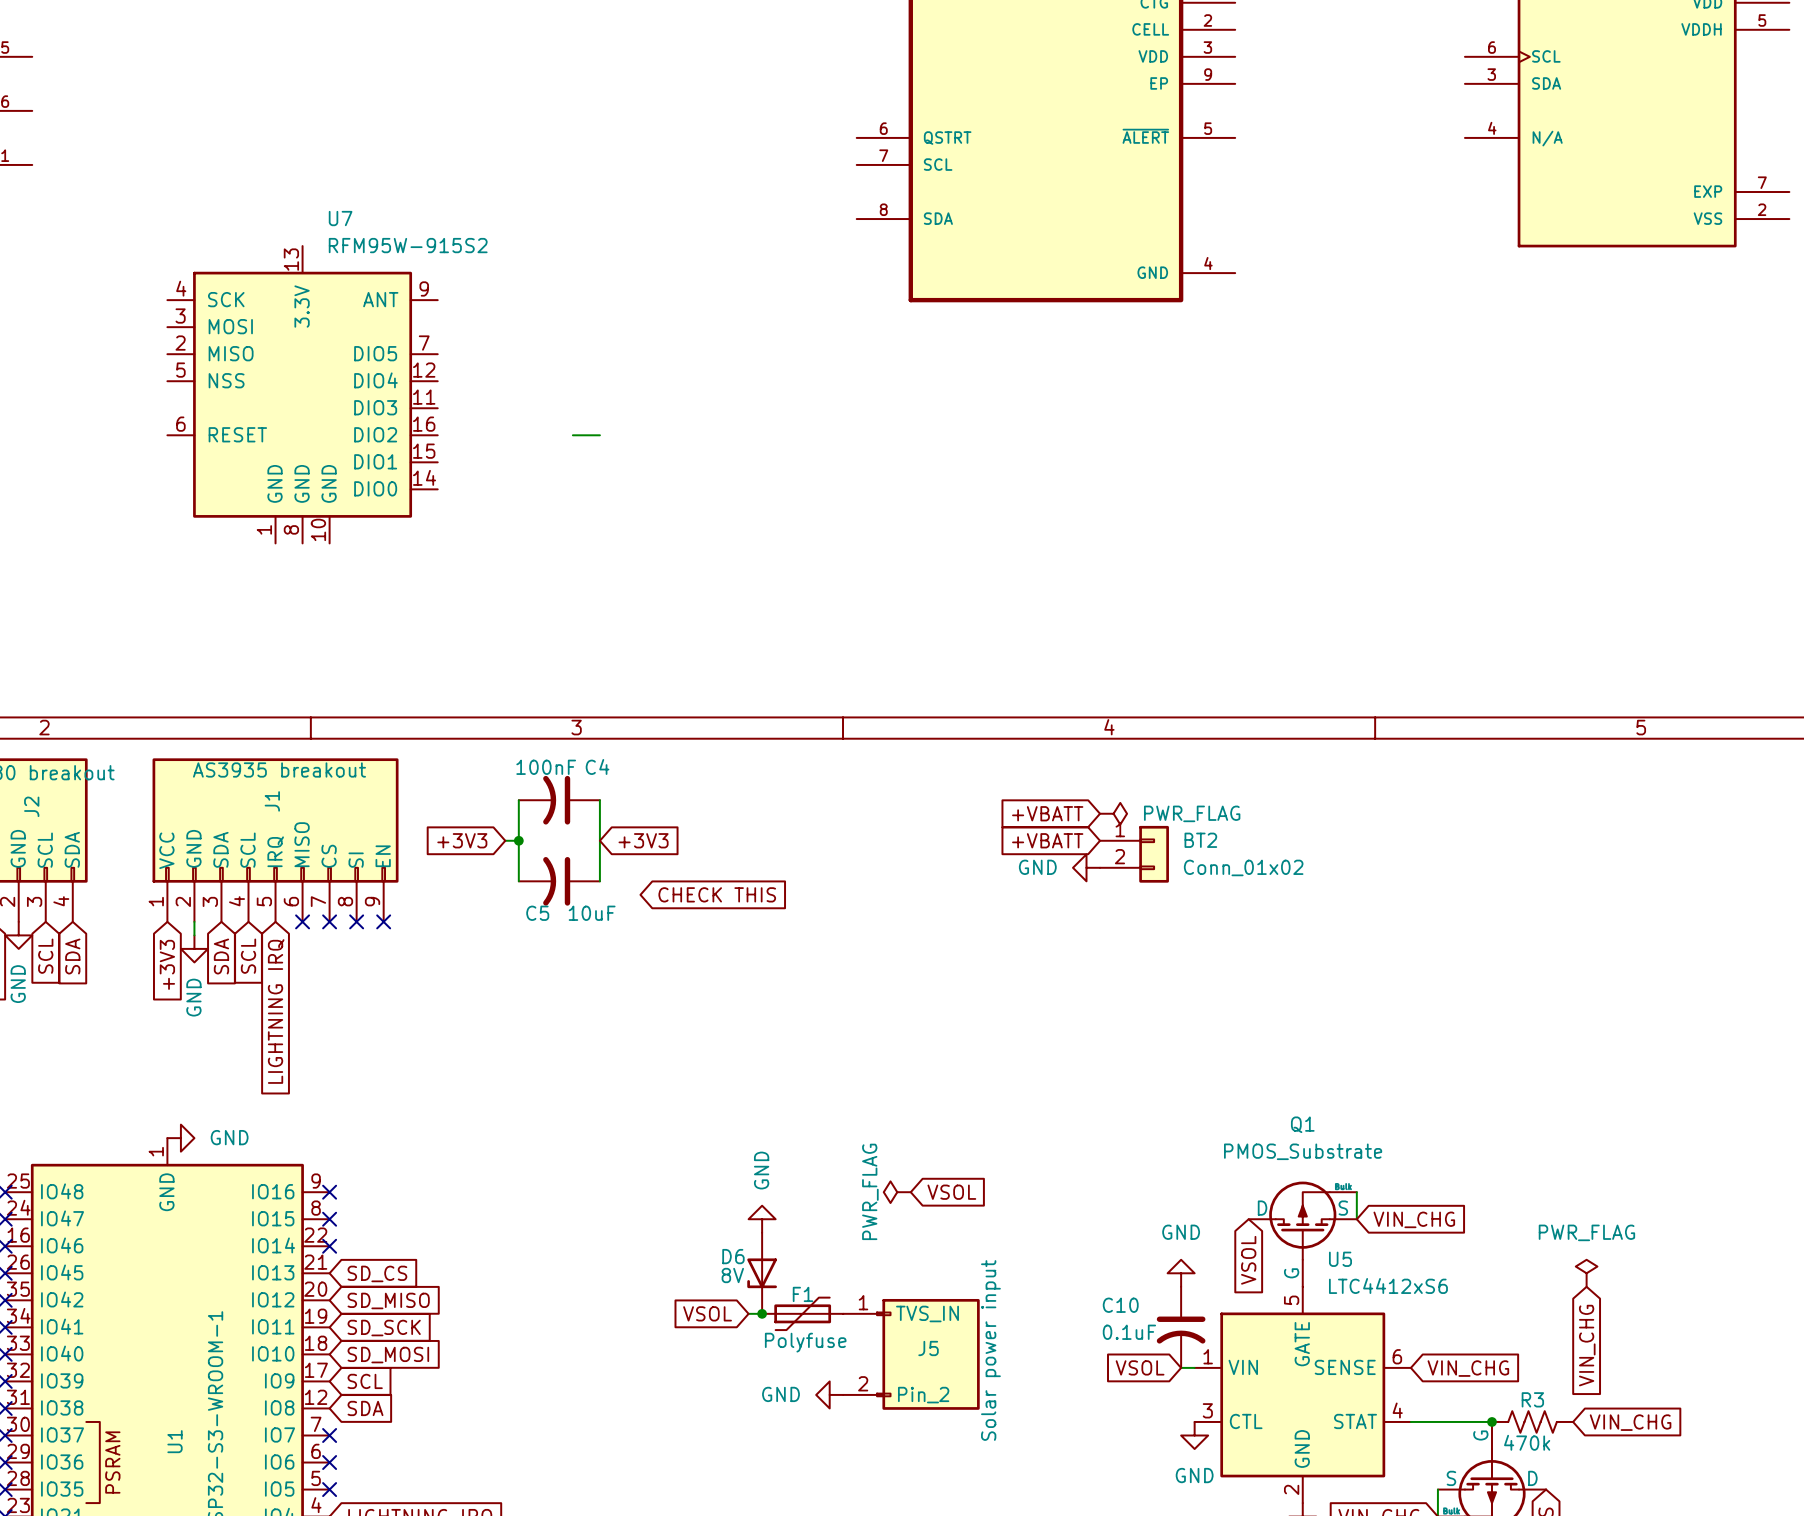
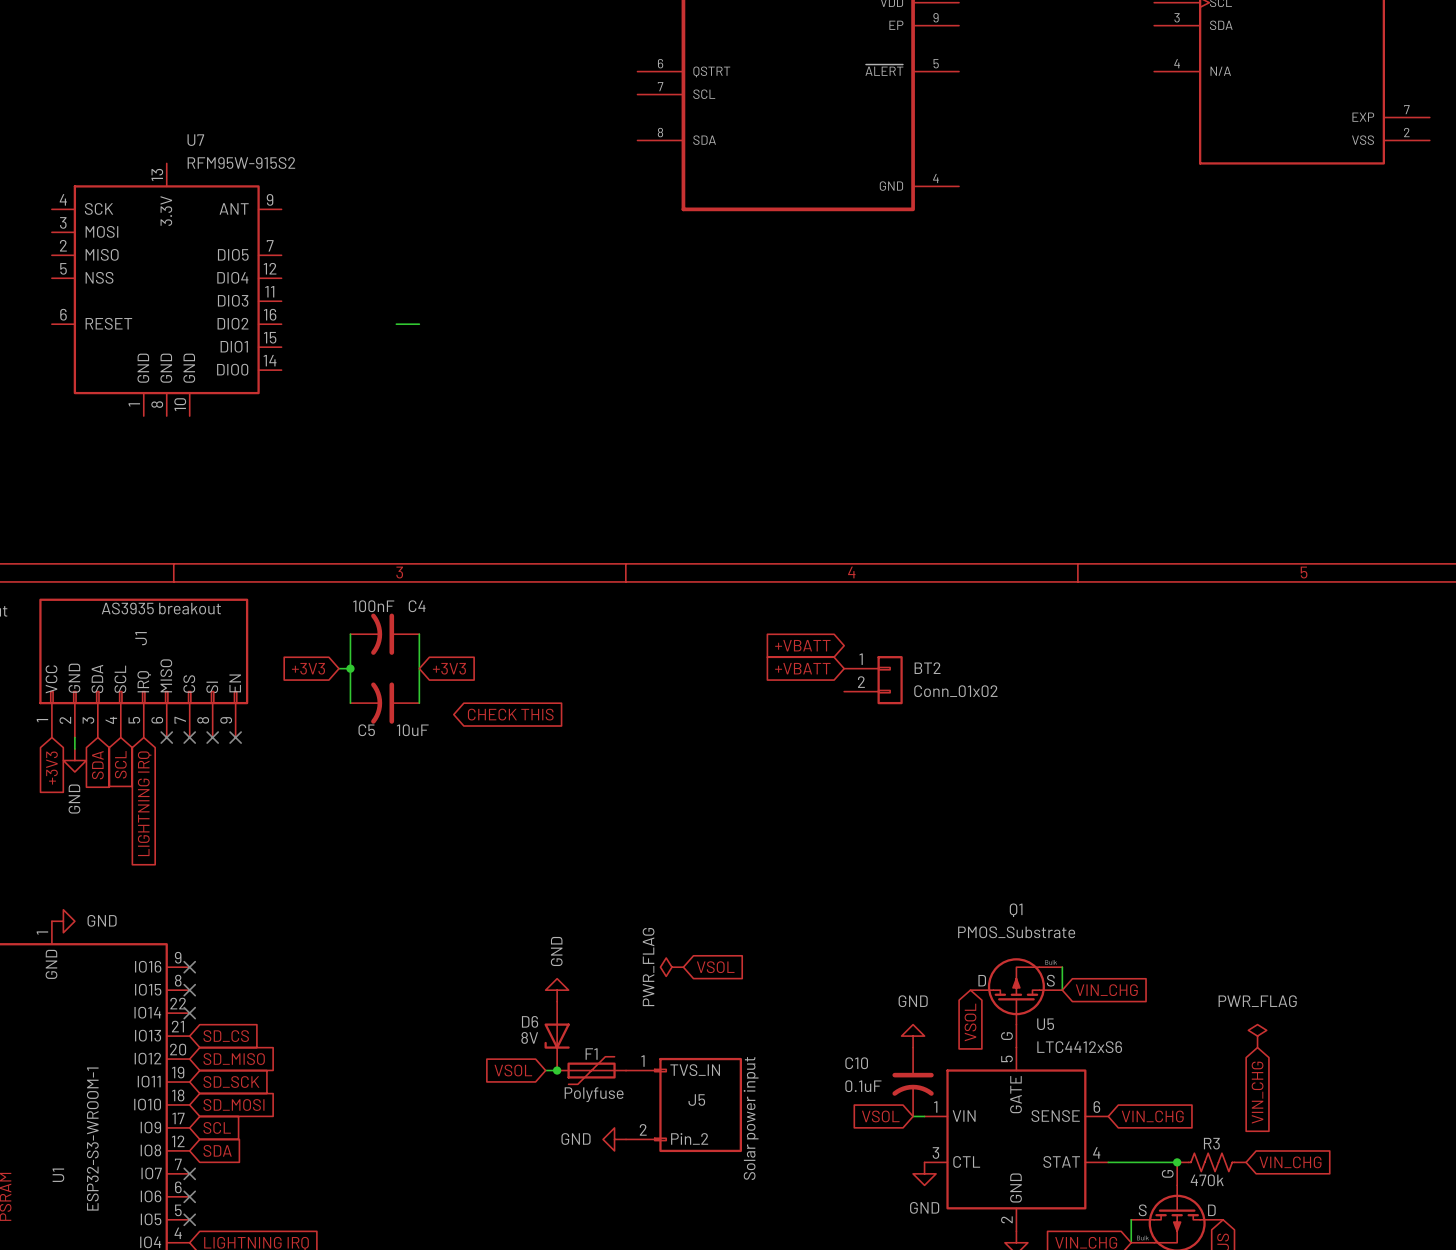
power symbol: PWR_FLAG (1113, 813) -> none
power symbol: GND (1086, 867) -> none

